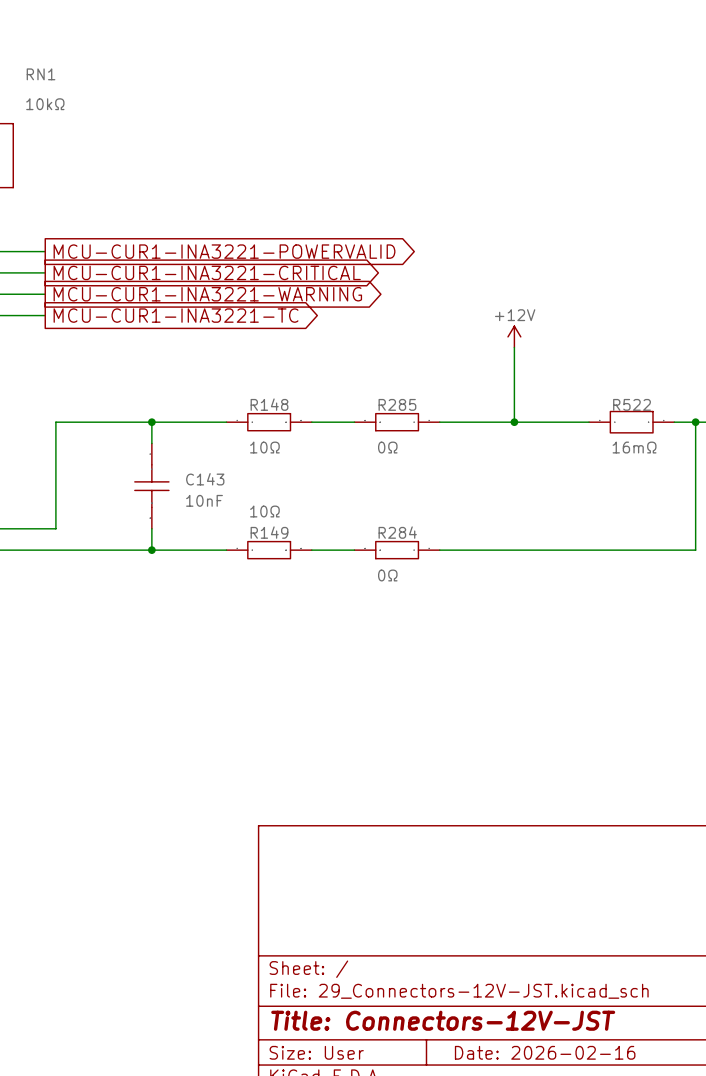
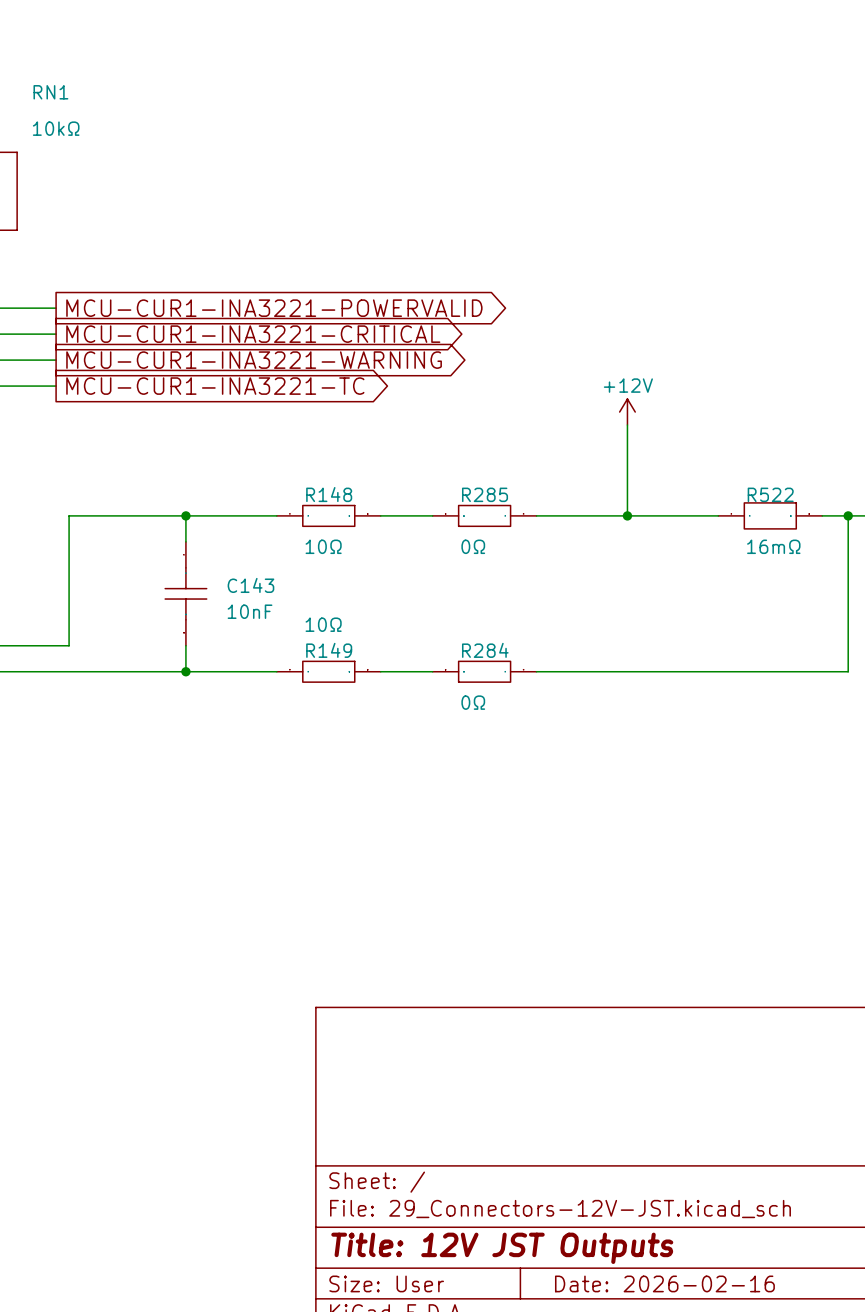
title block: Title: Connectors-12V-JST (443, 1020) -> Title: 12V JST Outputs (502, 1248)

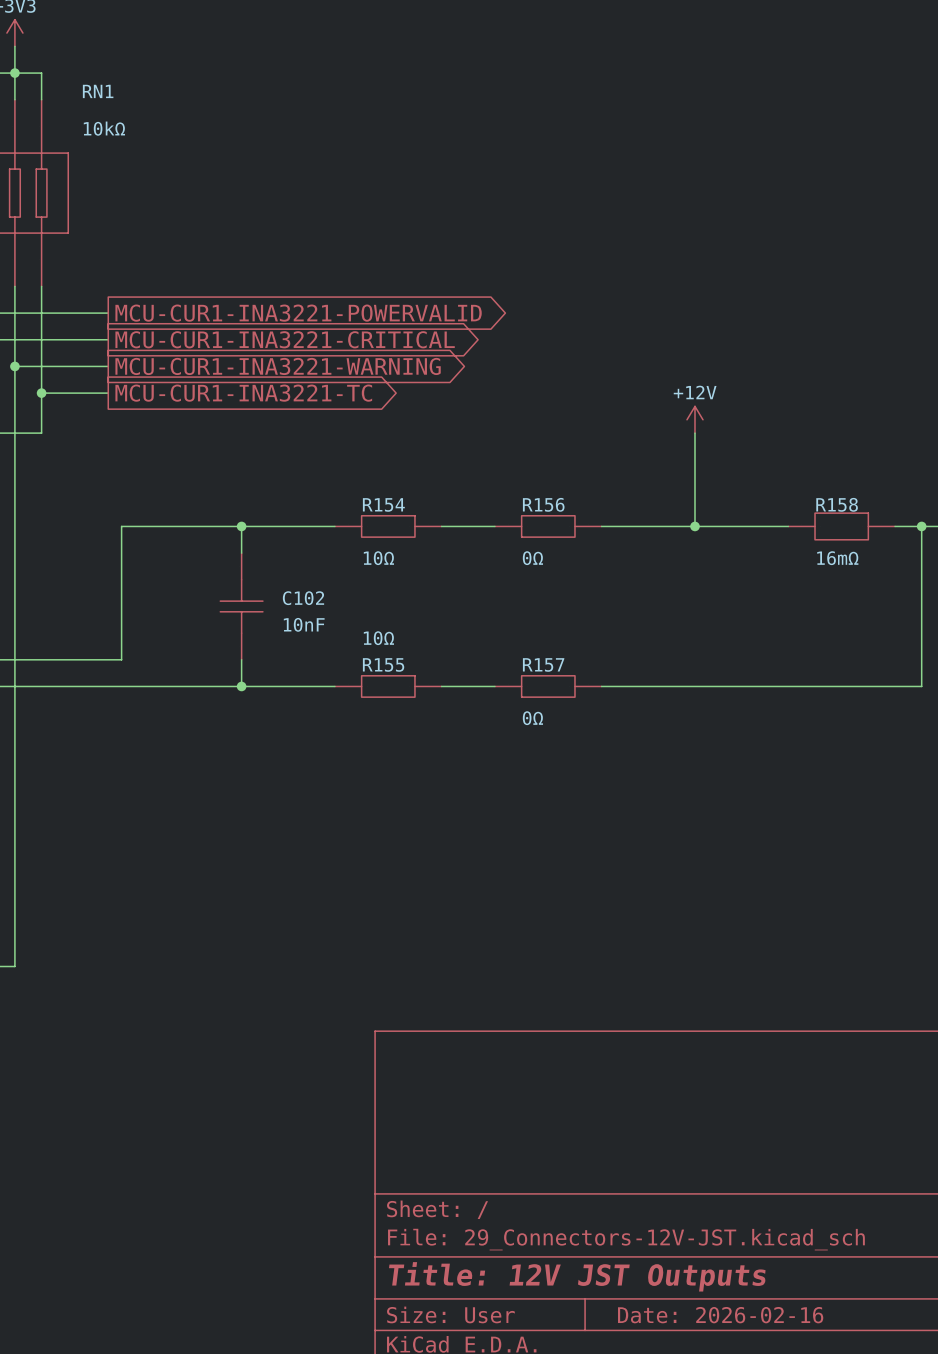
R148 name: R148 (329, 494) -> R154 (383, 504)
R285 name: R285 (485, 494) -> R156 (543, 504)
R522 name: R522 (770, 494) -> R158 (837, 504)
C143 name: C143 (250, 585) -> C102 (303, 598)
R149 name: R149 (329, 650) -> R155 (383, 664)
R284 name: R284 (485, 650) -> R157 (543, 664)

